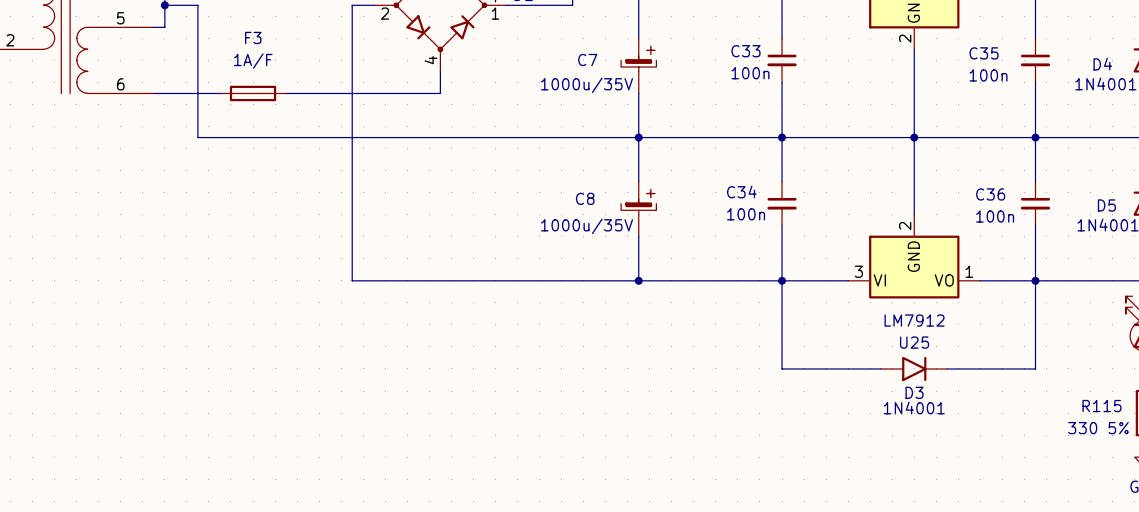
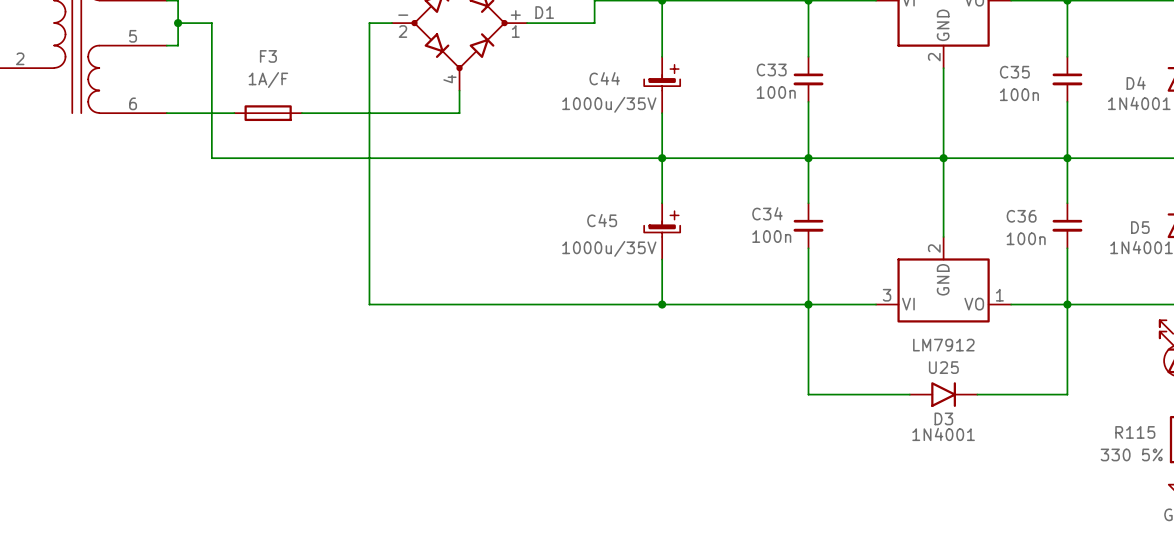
C7 name: C7 (587, 60) -> C44 (604, 78)
C8 name: C8 (585, 198) -> C45 (602, 220)

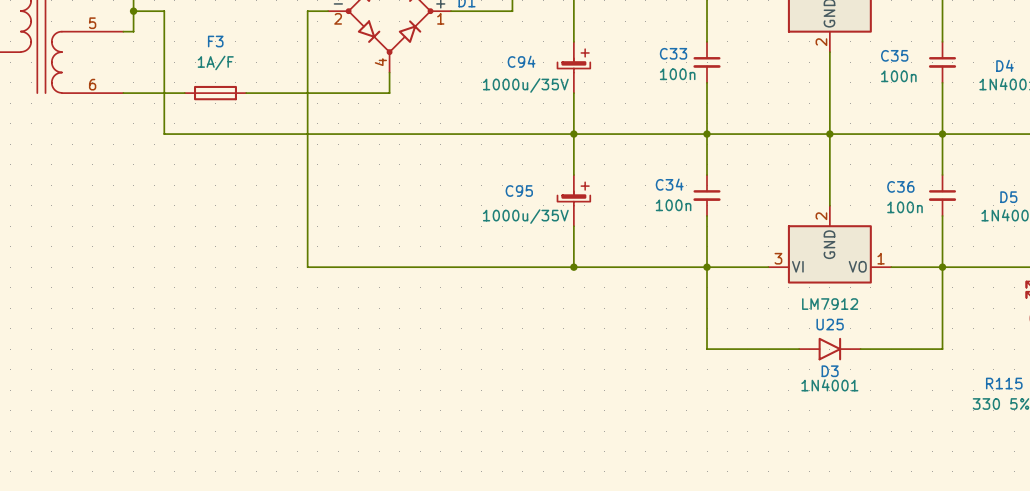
C44 name: C44 (604, 78) -> C94 (521, 61)
C45 name: C45 (602, 220) -> C95 (519, 191)

